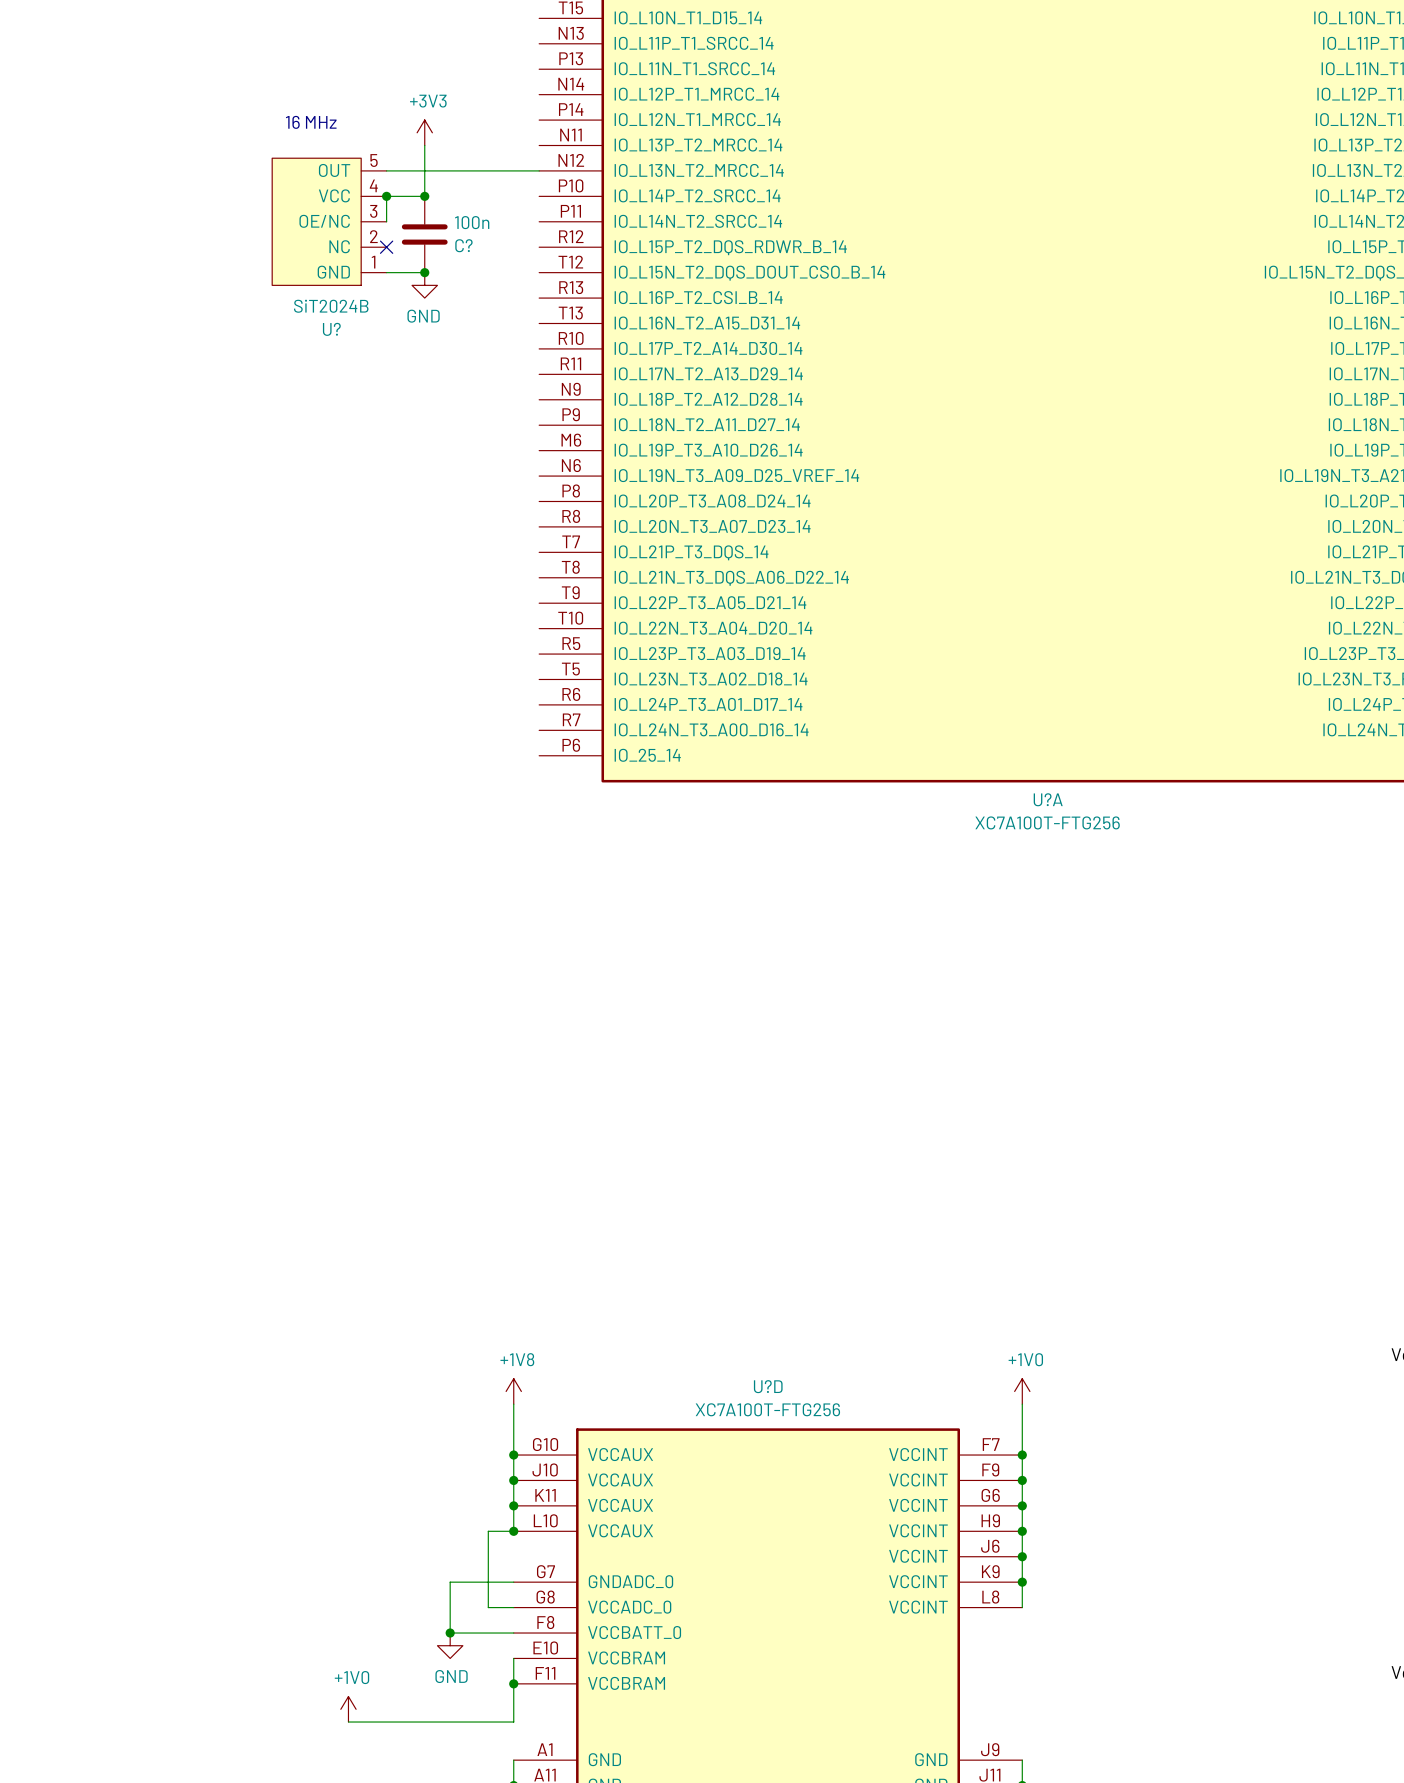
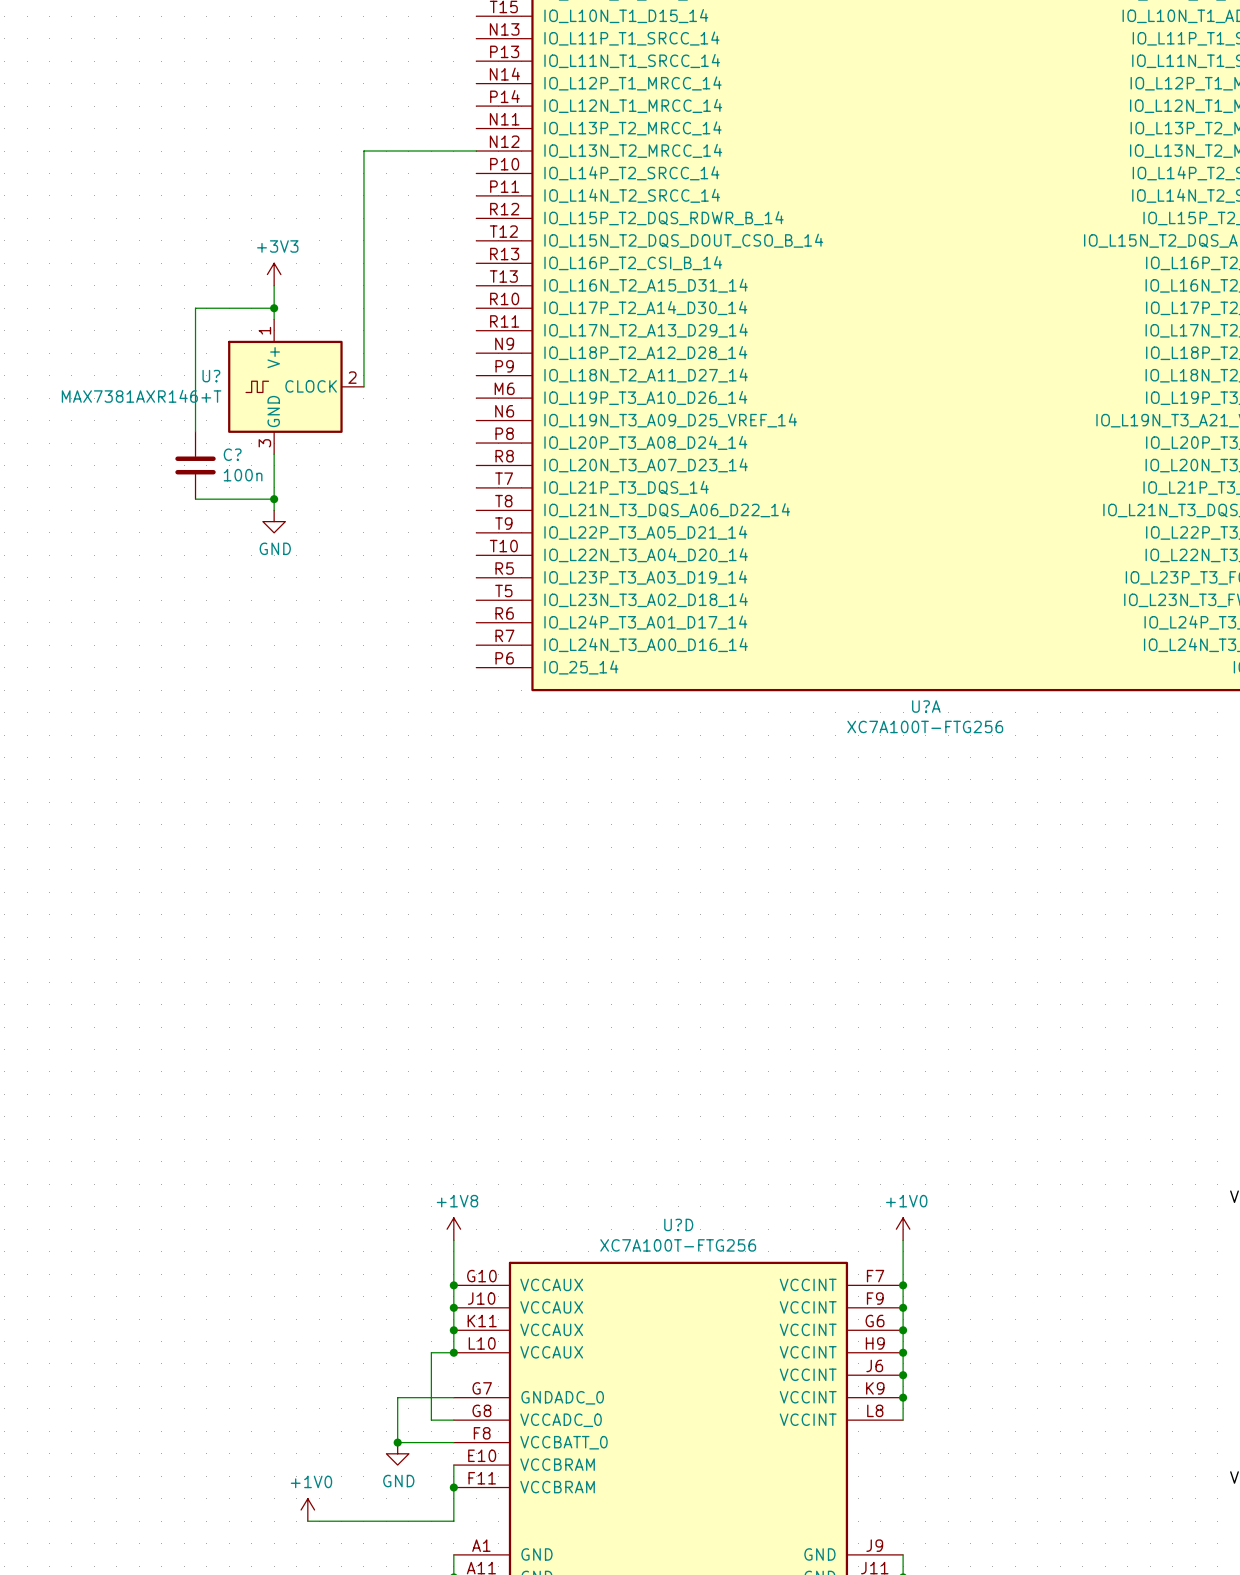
text: 16 MHz (311, 122) -> none
power symbol position: +3V3 (424, 132) -> +3V3 (274, 274)
wire: (424, 145) (424, 196) (386, 196) (386, 221) -> none
wire: (386, 170) (412, 170) -> (363, 386) (363, 151)
junction: (386, 196) -> none
junction: (424, 196) -> none
U?: SiT2024B (329, 221) -> none
C?: 100n (424, 234) -> none
no-connect mark: (386, 247) -> none
wire: (386, 272) (424, 272) -> none
junction: (424, 272) -> none
power symbol: GND (424, 285) -> none
wire: none -> (274, 285) (274, 319)
wire: none -> (274, 308) (195, 308) (195, 431)
junction: none -> (274, 308)
U?: none -> MAX7381AXR146+T (296, 386)
wire: none -> (274, 454) (274, 510)
C?: none -> 100n (195, 465)
wire: none -> (195, 499) (274, 499)
junction: none -> (274, 499)
power symbol: none -> GND (274, 521)

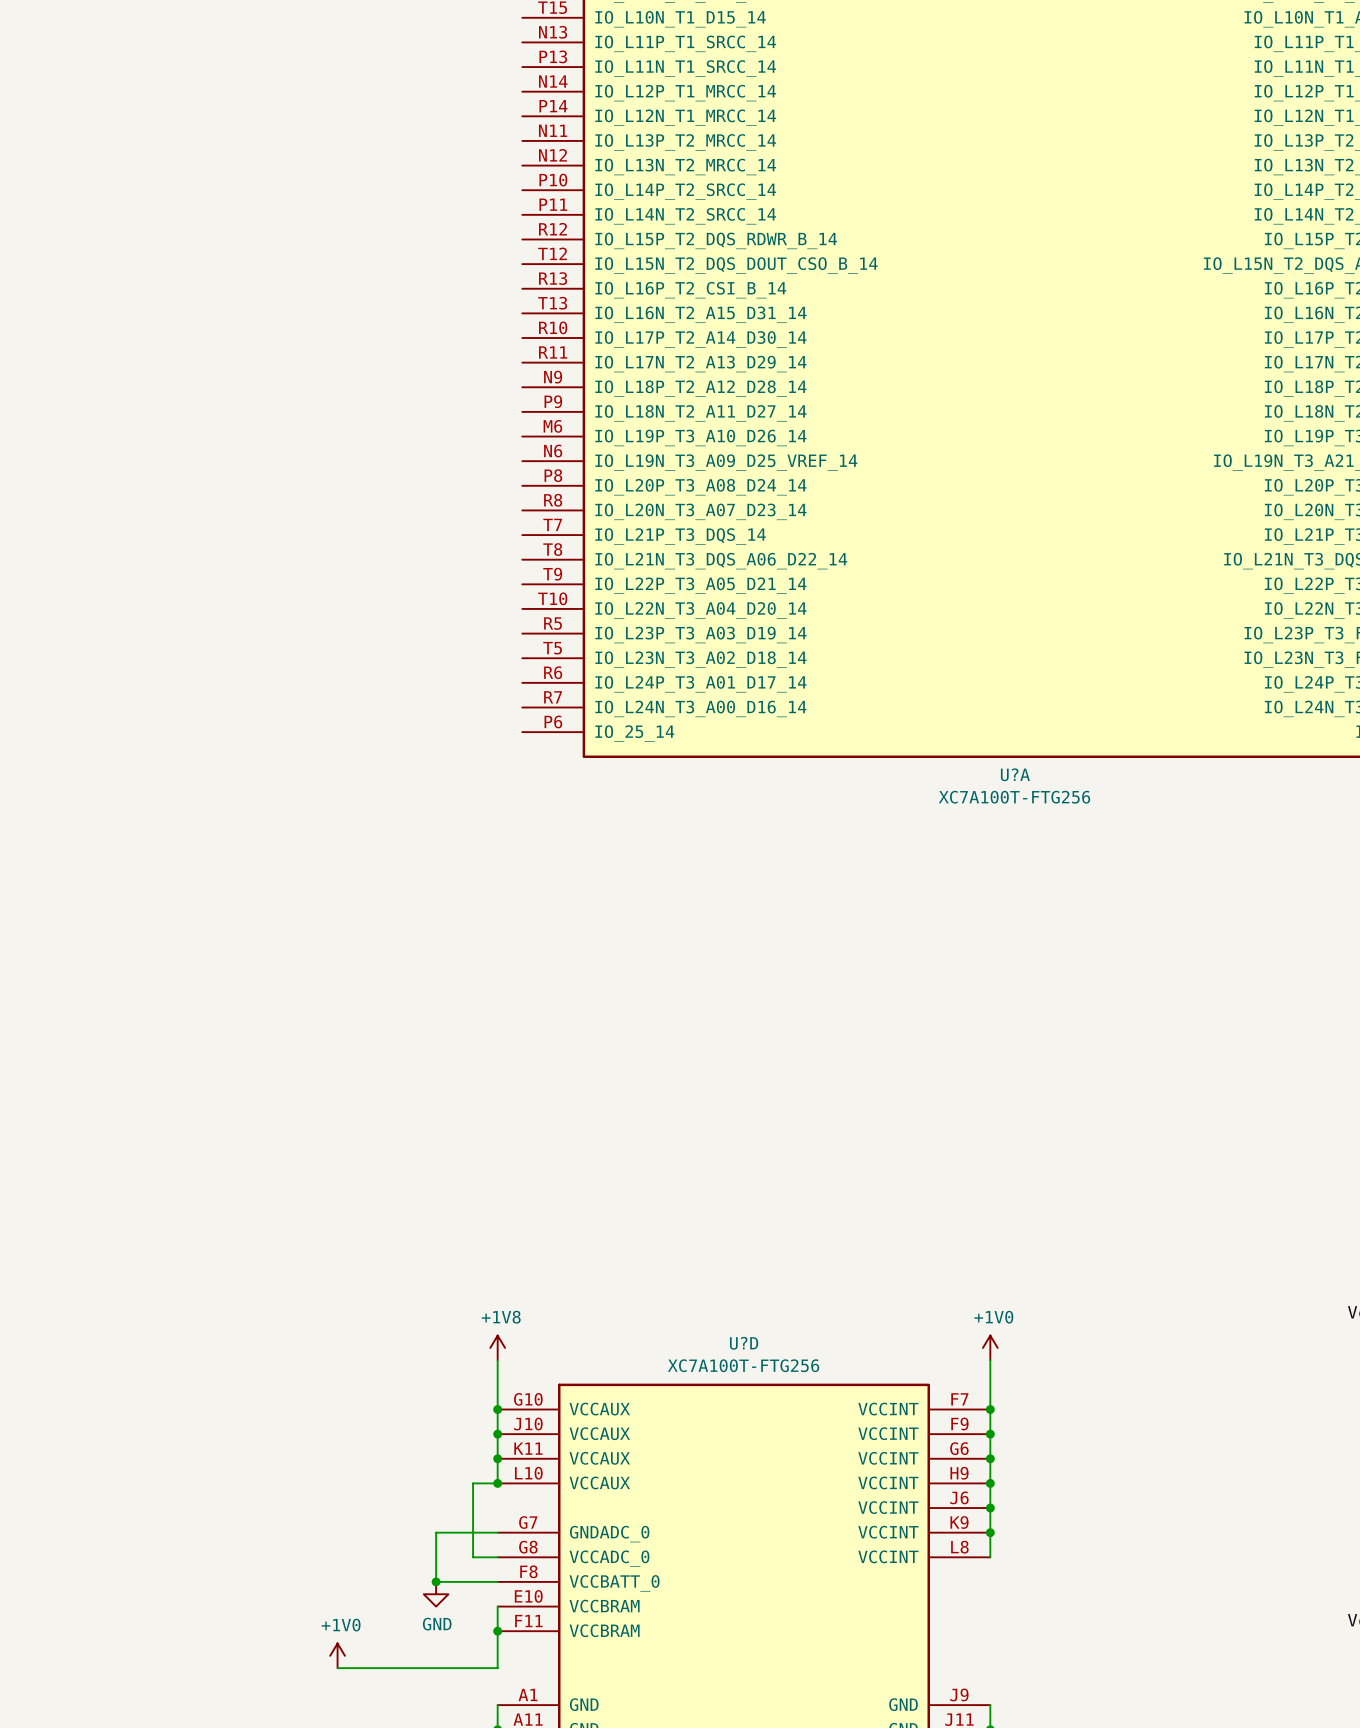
wire: (476, 151) (363, 151) (363, 386) -> none
power symbol: +3V3 (274, 274) -> none
wire: (274, 285) (274, 319) -> none
wire: (274, 308) (195, 308) (195, 431) -> none
junction: (274, 308) -> none
U?: MAX7381AXR146+T (296, 386) -> none
wire: (274, 454) (274, 510) -> none
C?: 100n (195, 465) -> none
wire: (195, 499) (274, 499) -> none
junction: (274, 499) -> none
power symbol: GND (274, 521) -> none

